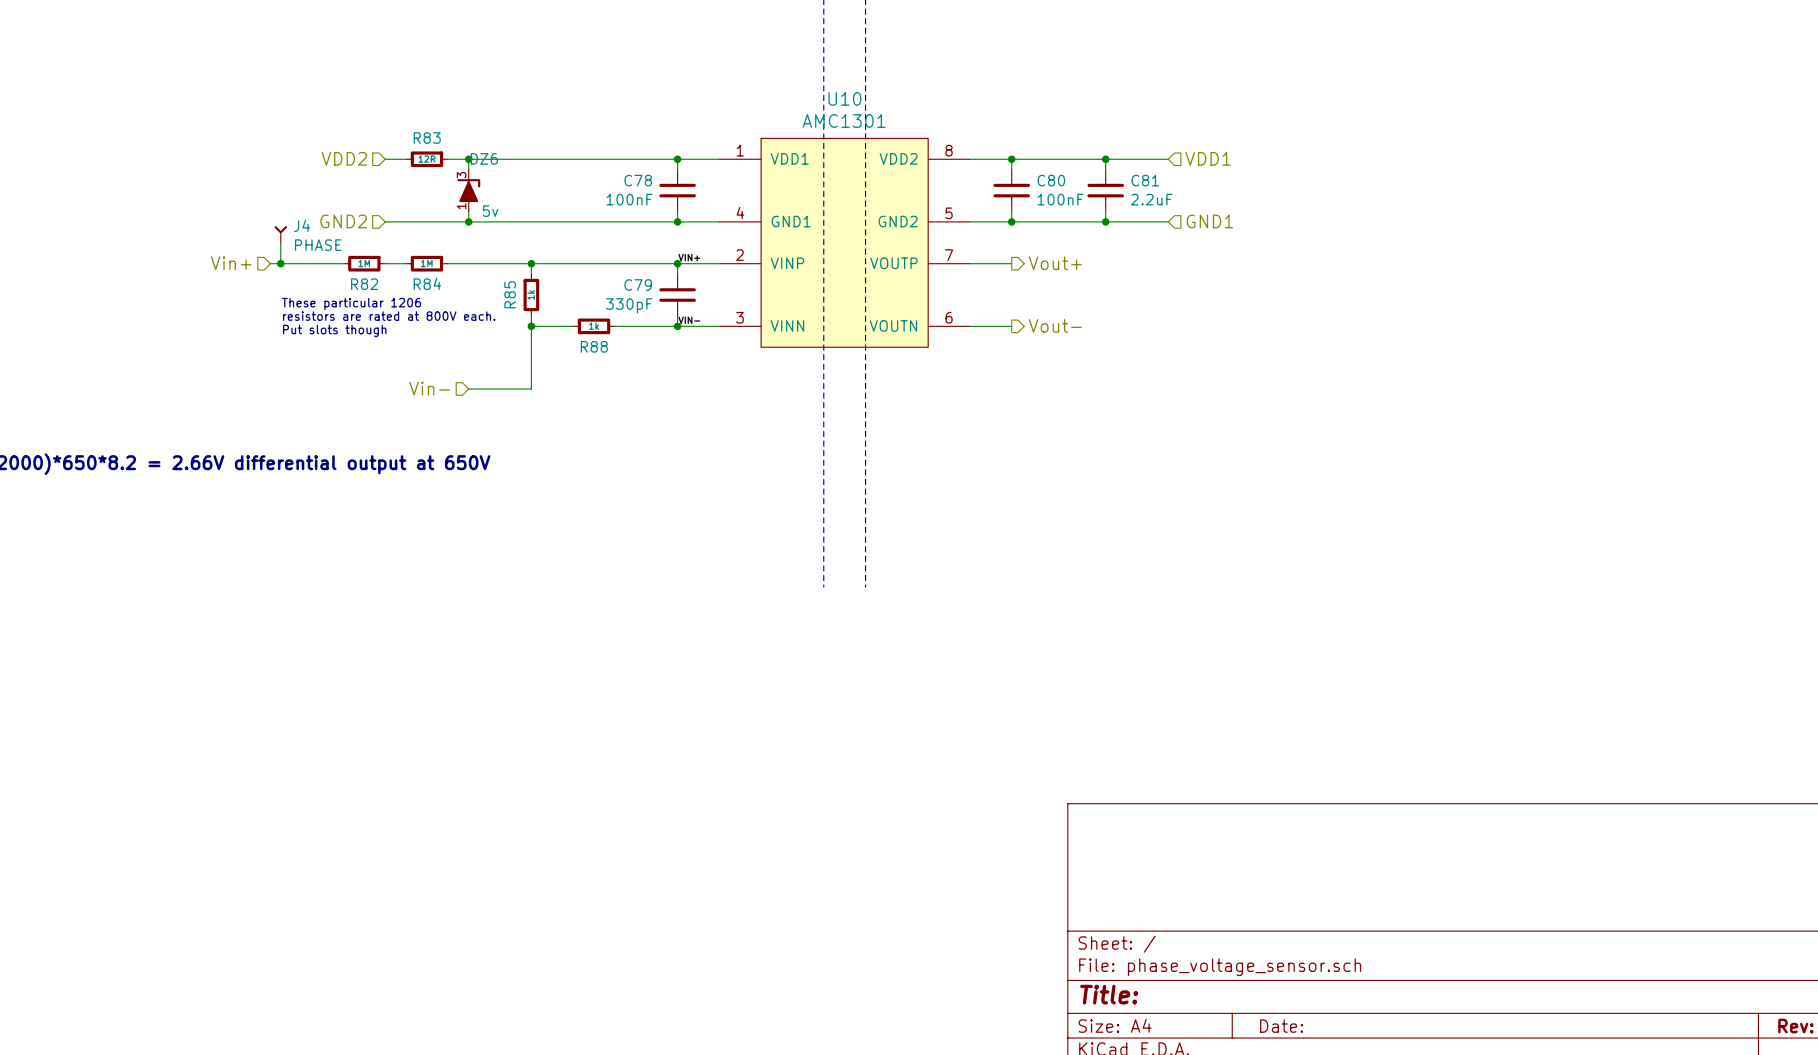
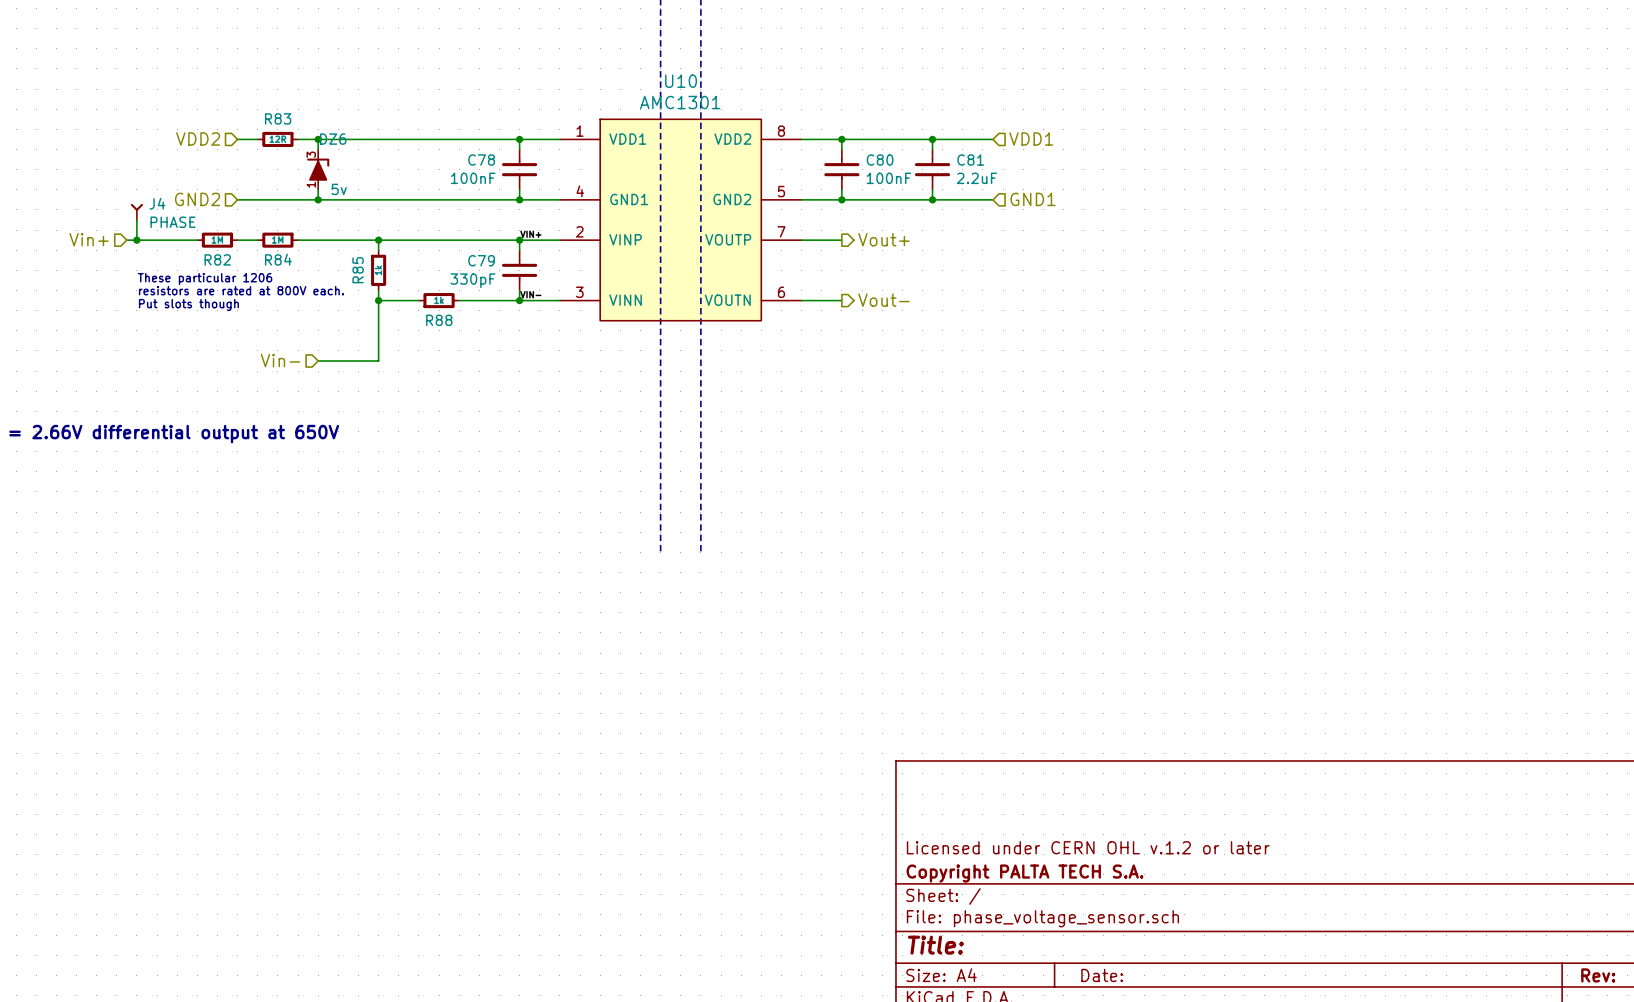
title block: none -> Licensed under CERN OHL v.1.2 or later (1088, 847)
title block: none -> Copyright PALTA TECH S.A. (1024, 873)

